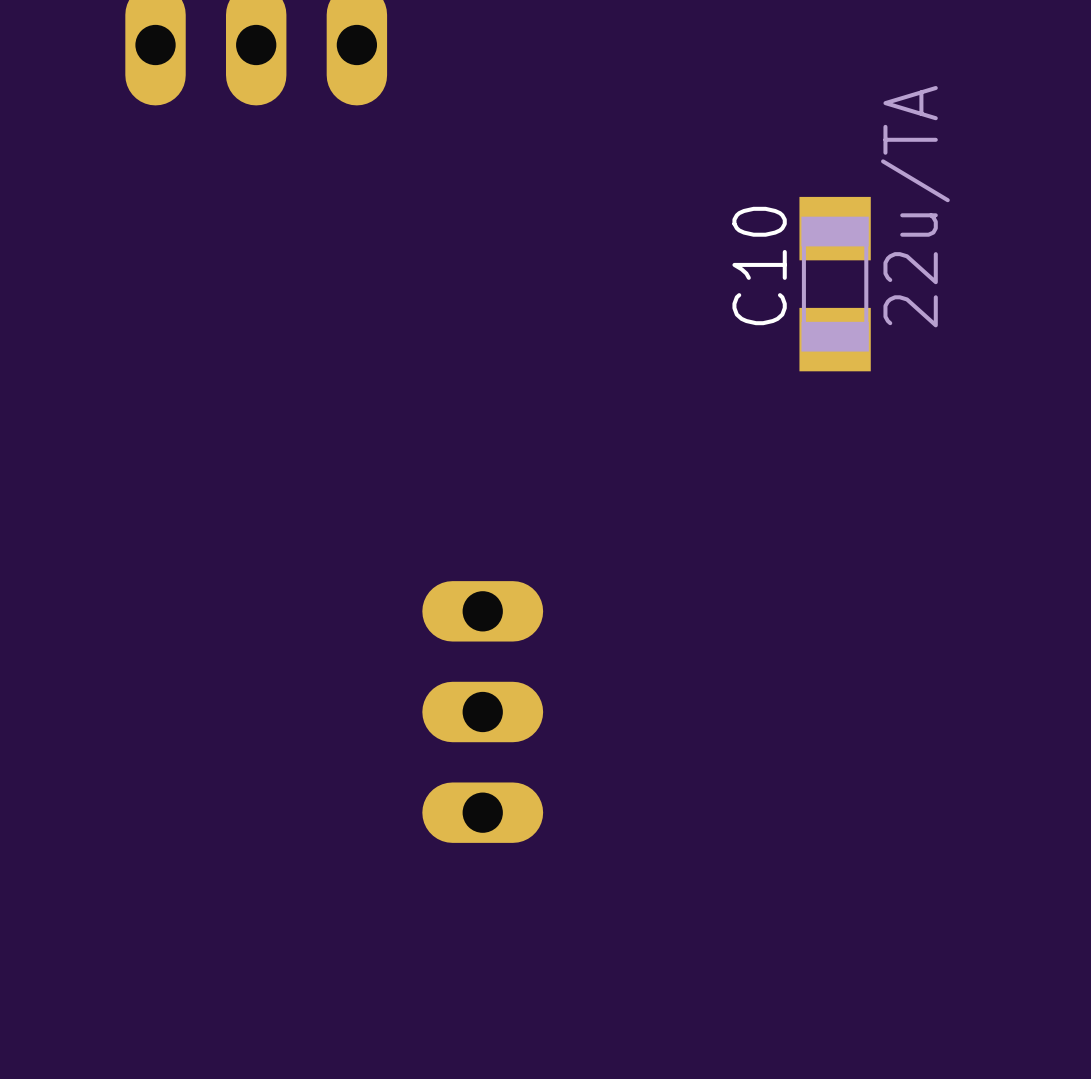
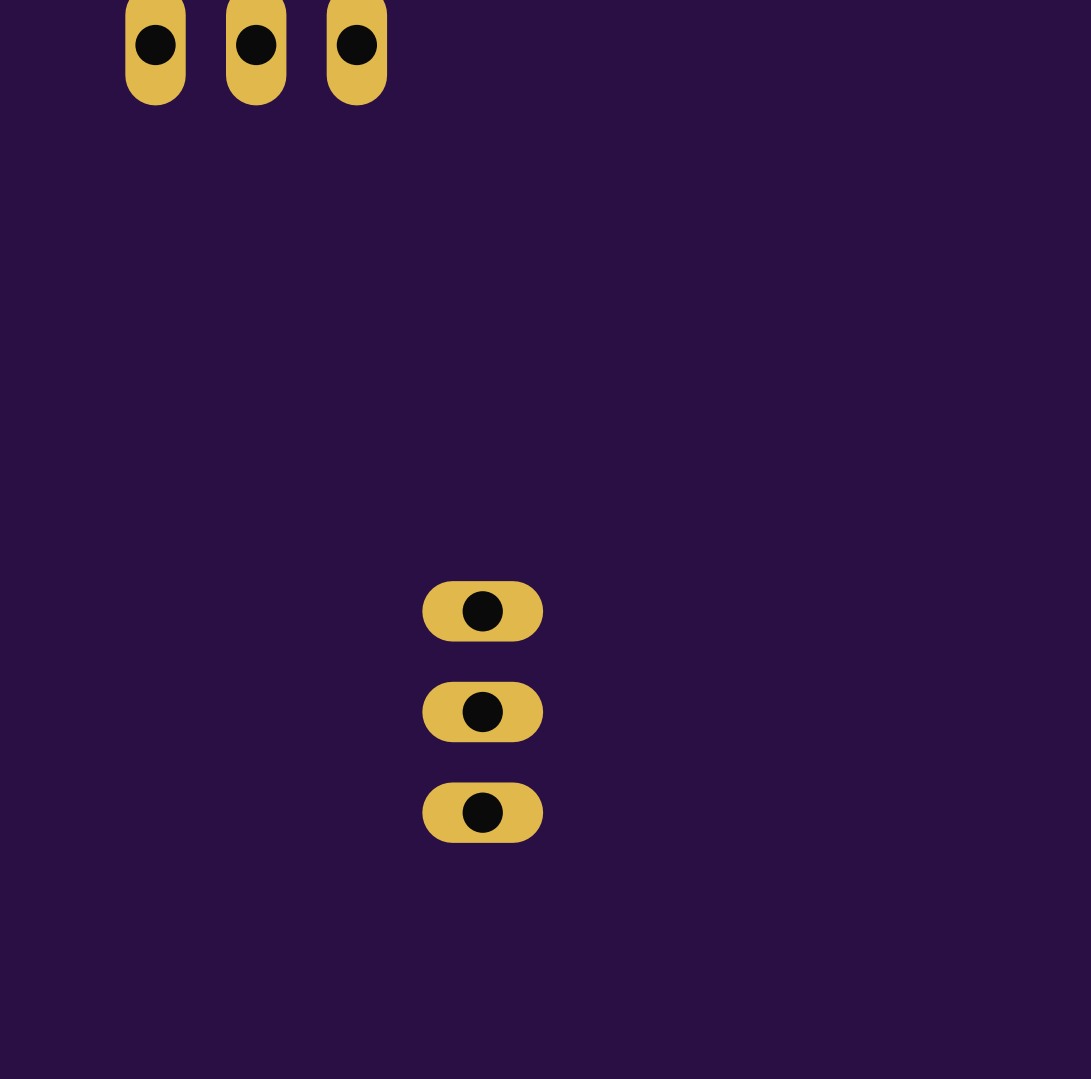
C10: 22u/TA (835, 284) -> none

